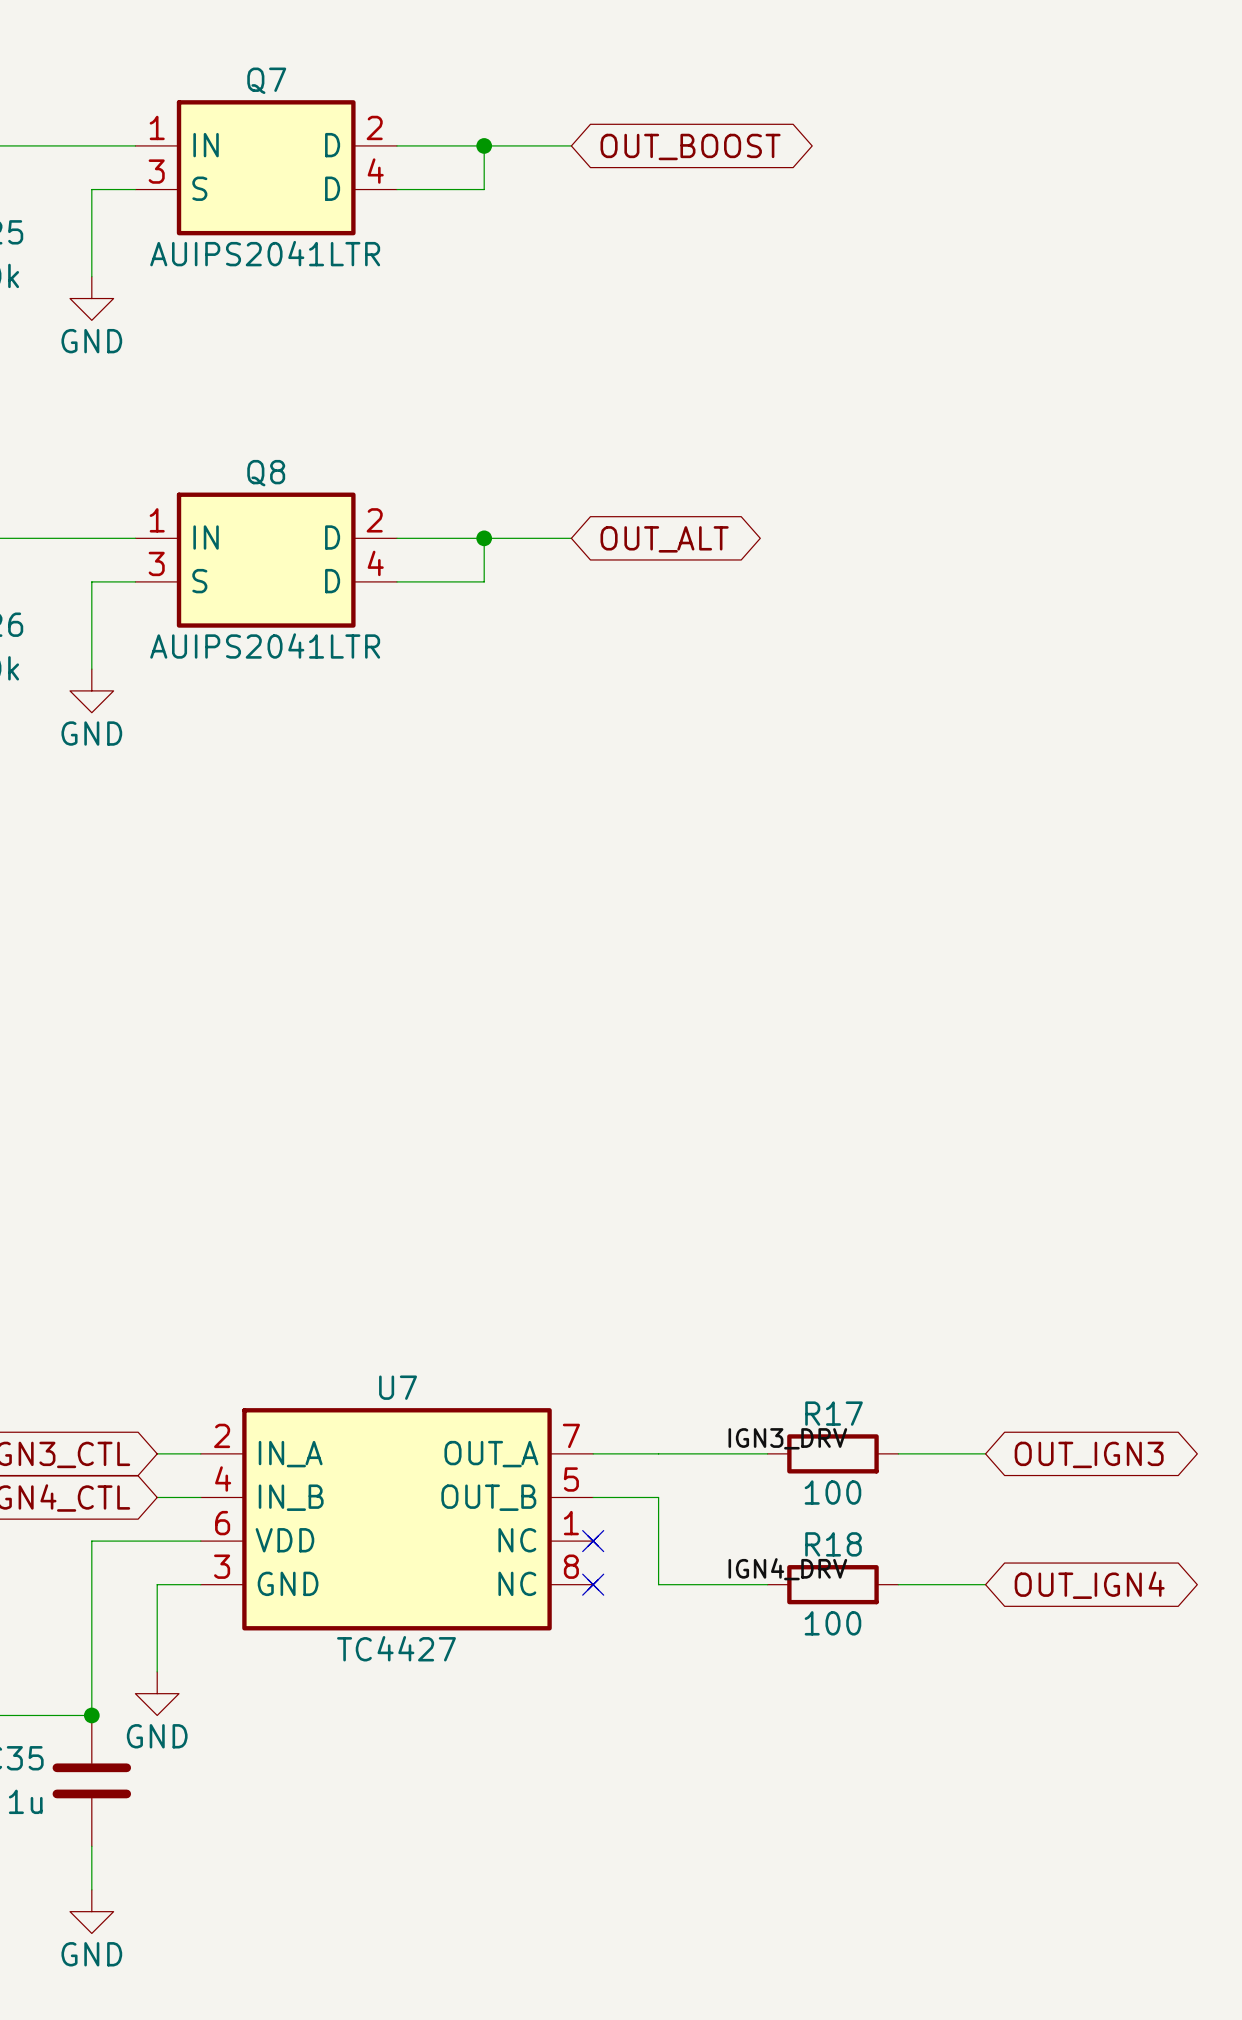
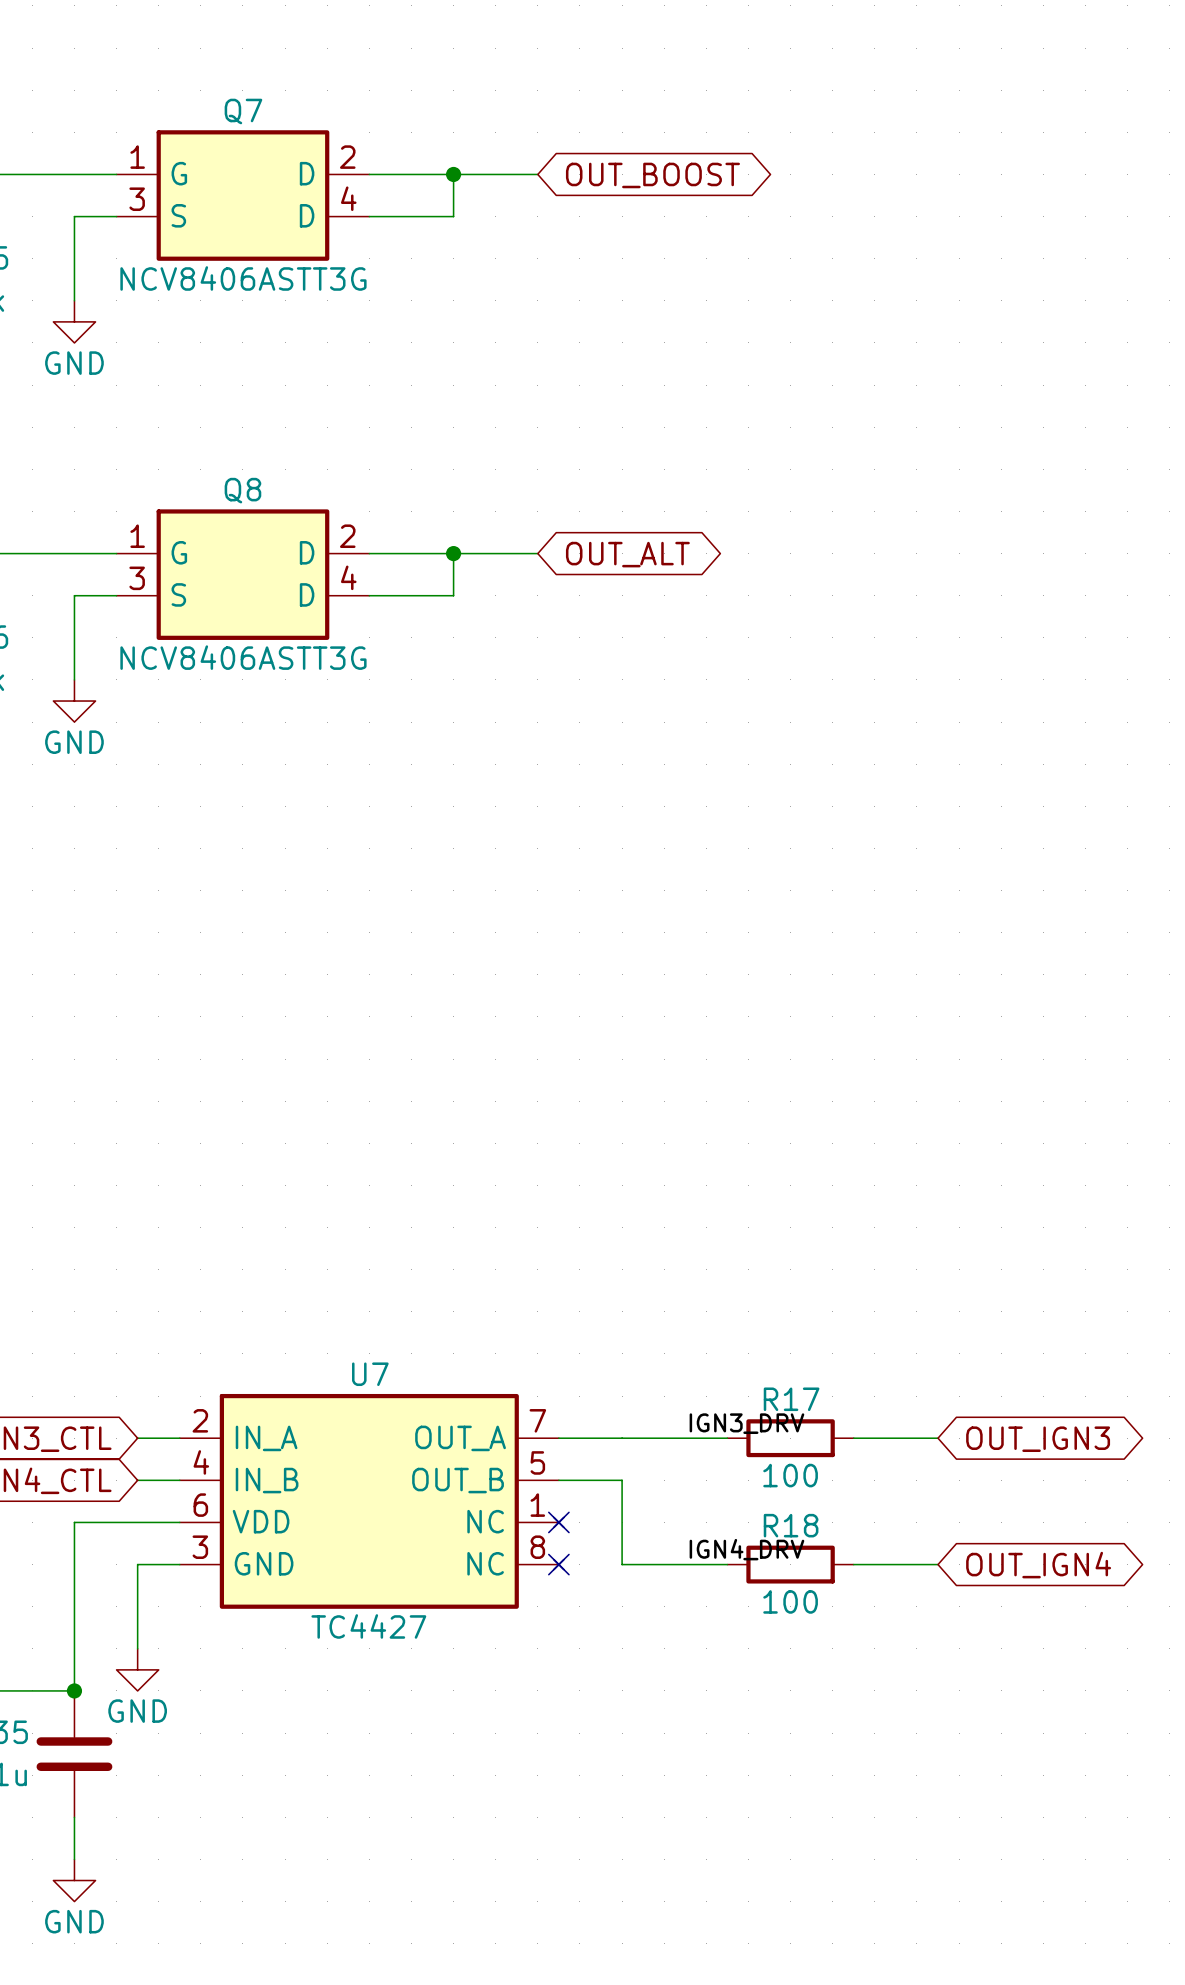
Q7 pin name: IN (206, 145) -> G (179, 173)
Q7 value: AUIPS2041LTR (265, 253) -> NCV8406ASTT3G (243, 278)
Q8 pin name: IN (206, 537) -> G (179, 552)
Q8 value: AUIPS2041LTR (265, 645) -> NCV8406ASTT3G (243, 657)

